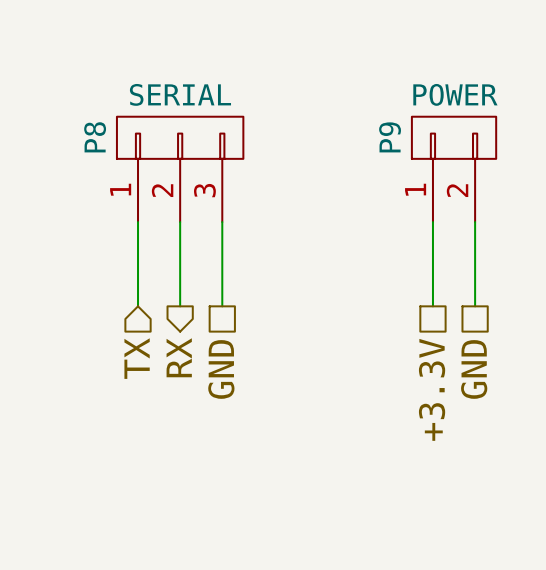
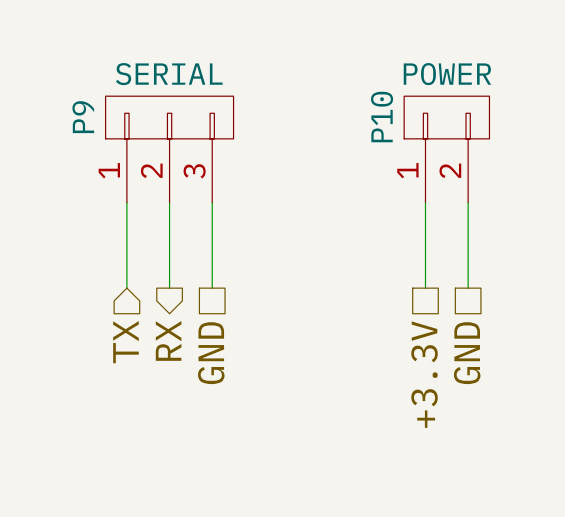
P8 name: P8 (95, 137) -> P9 (83, 117)
P9 name: P9 (390, 137) -> P10 (382, 117)

